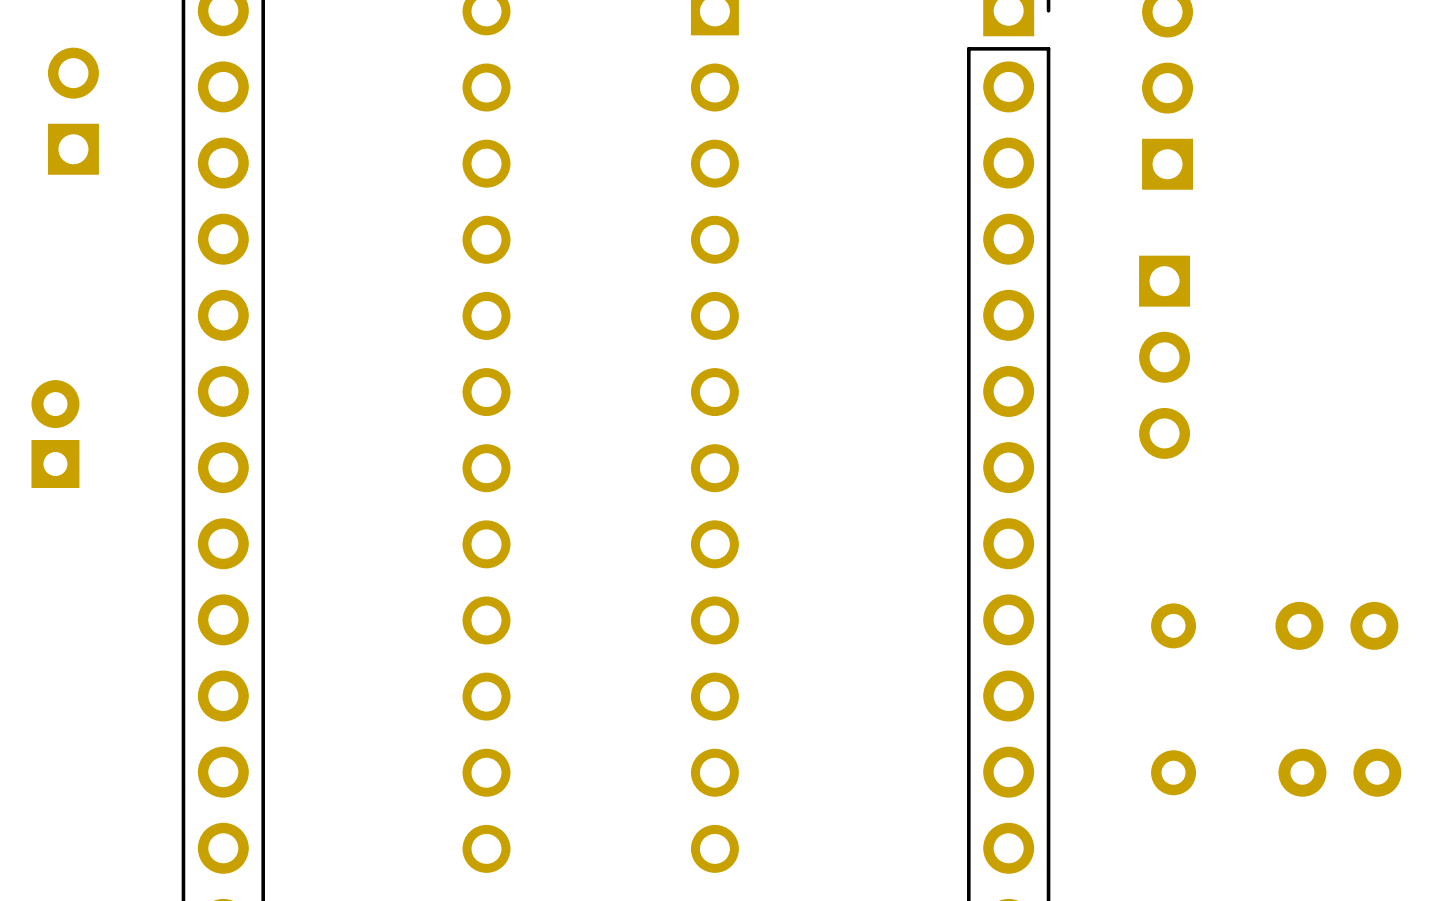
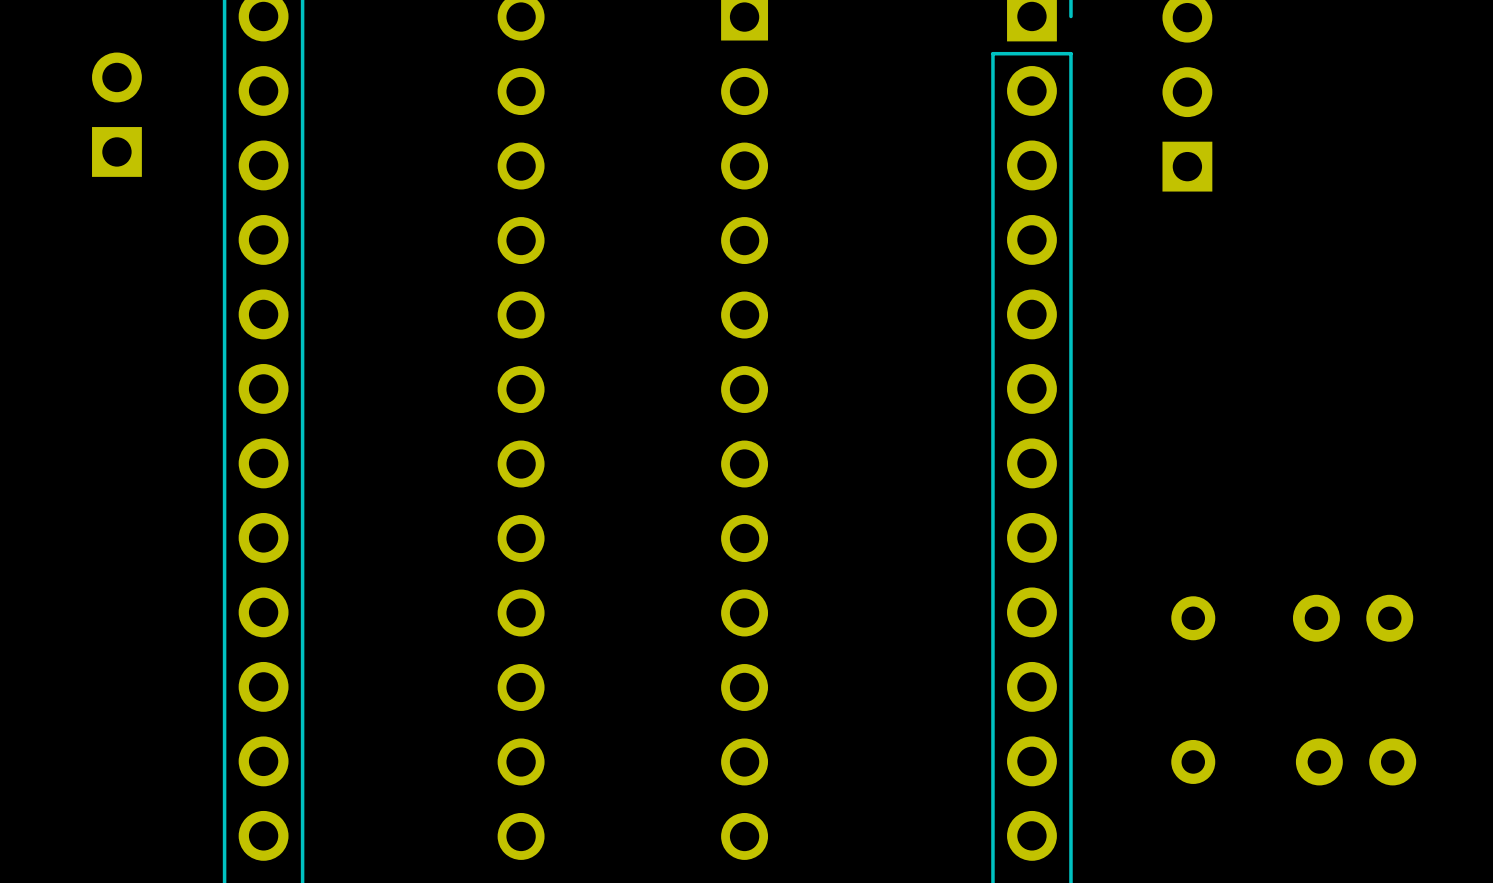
part: (1164, 357) -> none
part: (55, 434) -> none

